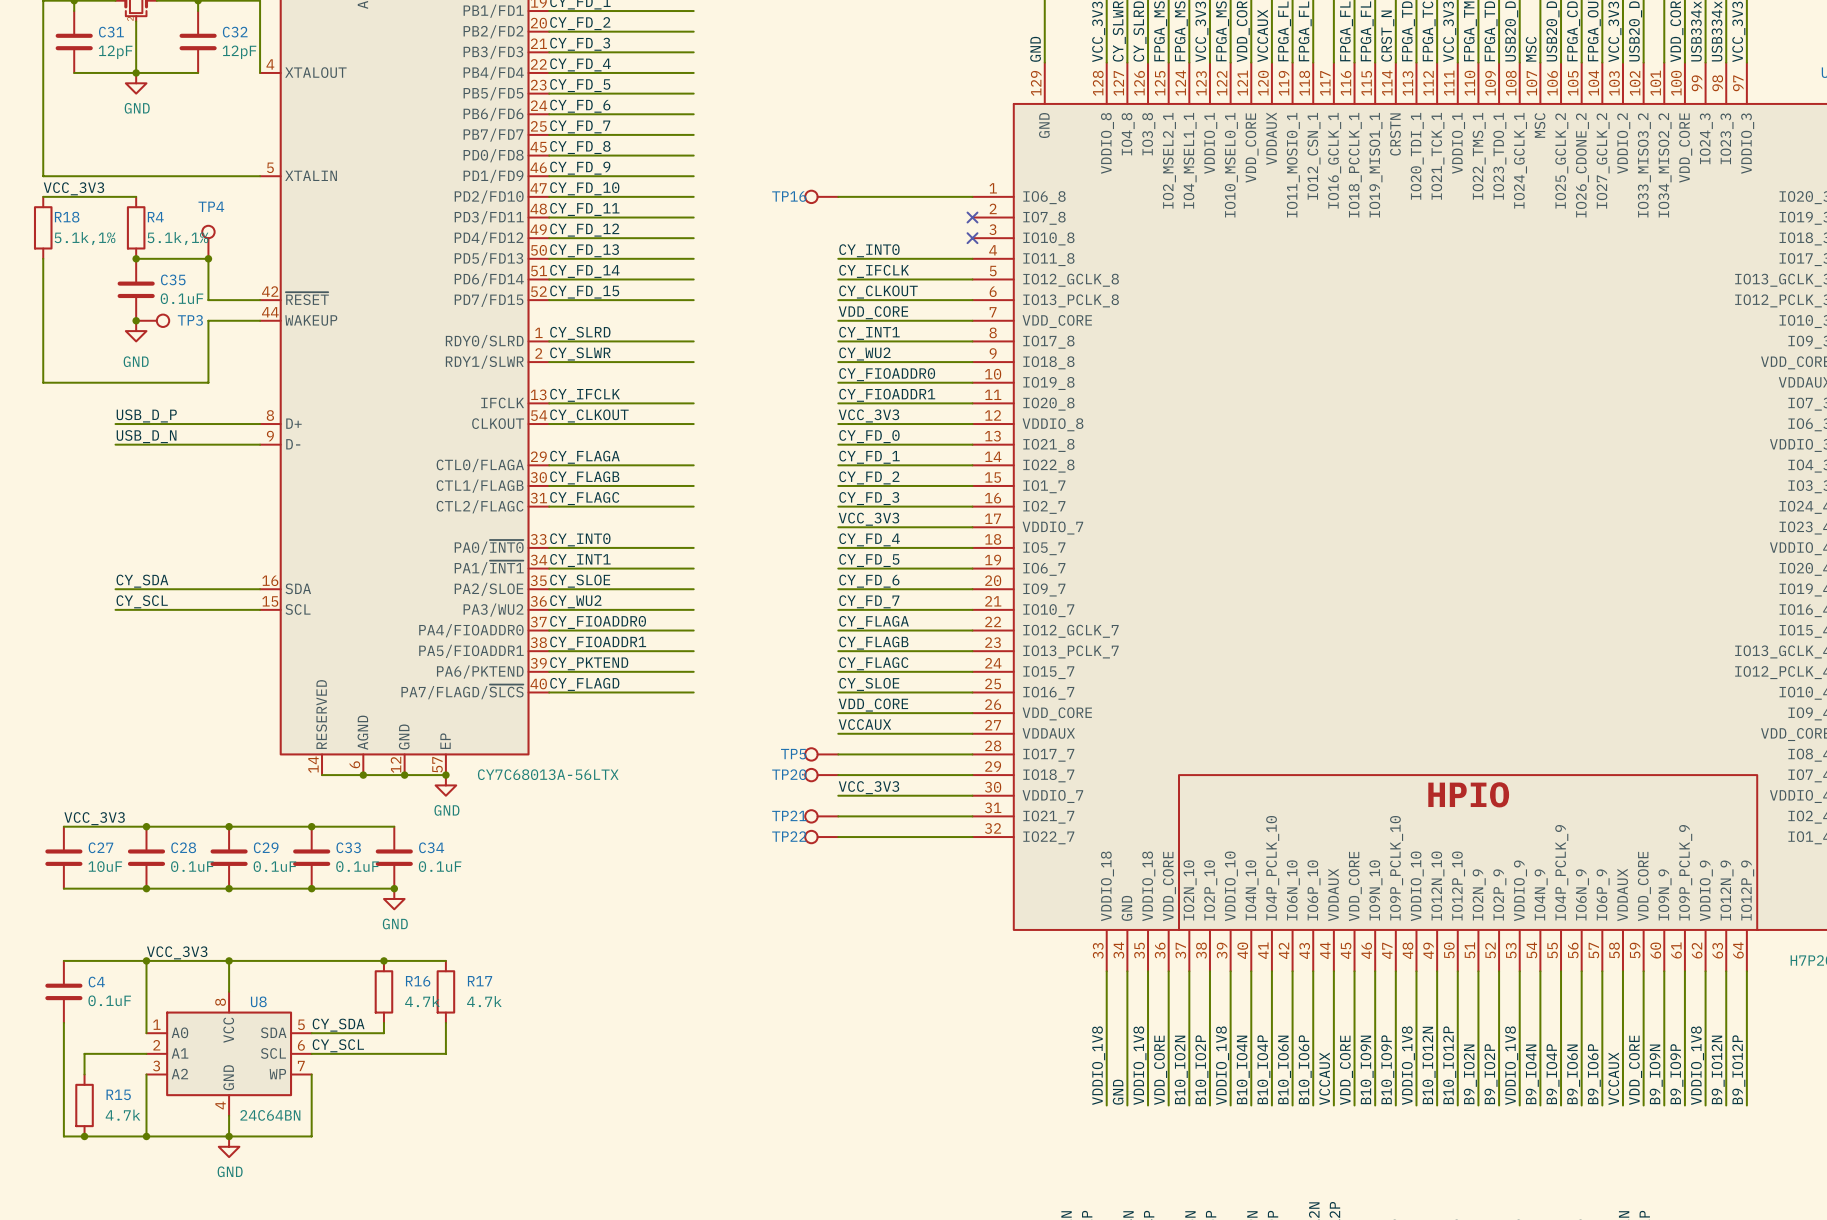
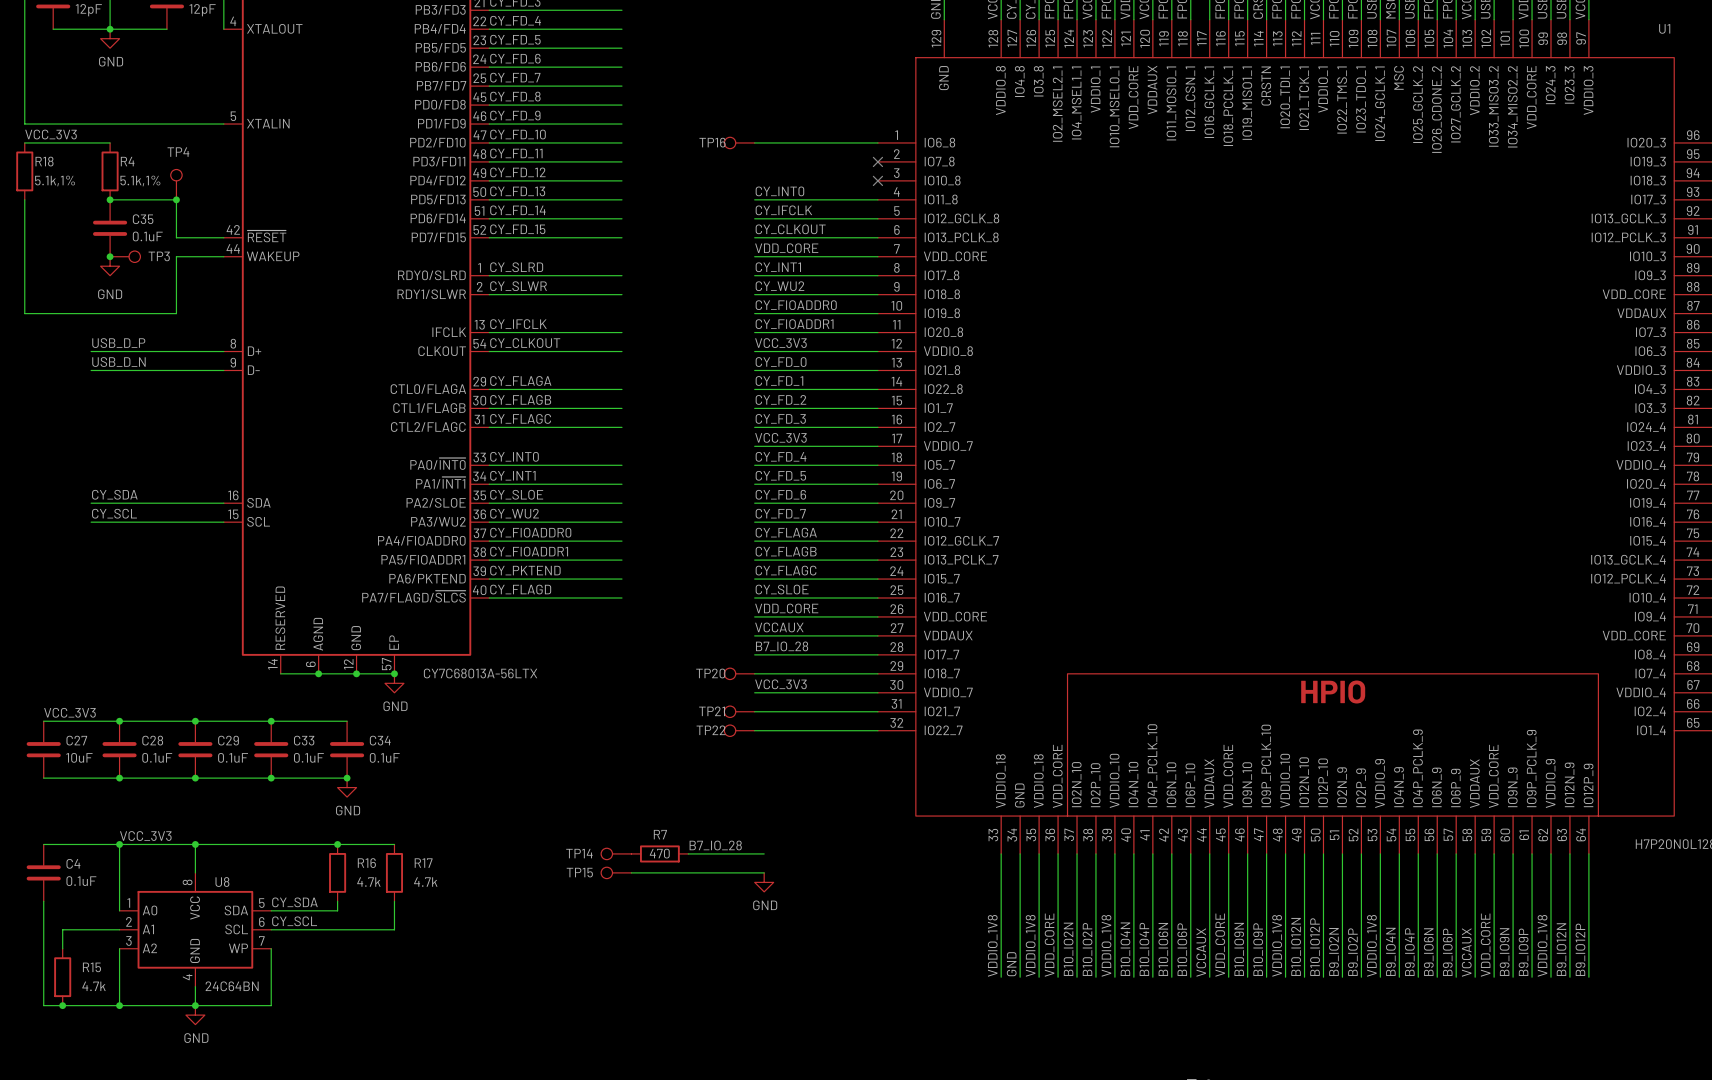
label: none -> B7_IO_28 (782, 646)
TP5: (821, 754) -> none
label: none -> B7_IO_28 (715, 845)
TP14: none -> (616, 853)
R7: none -> 470 (659, 853)
wire: none -> (688, 853) (764, 853)
TP15: none -> (616, 872)
wire: none -> (631, 872) (764, 872)
power symbol: none -> GND (764, 882)

